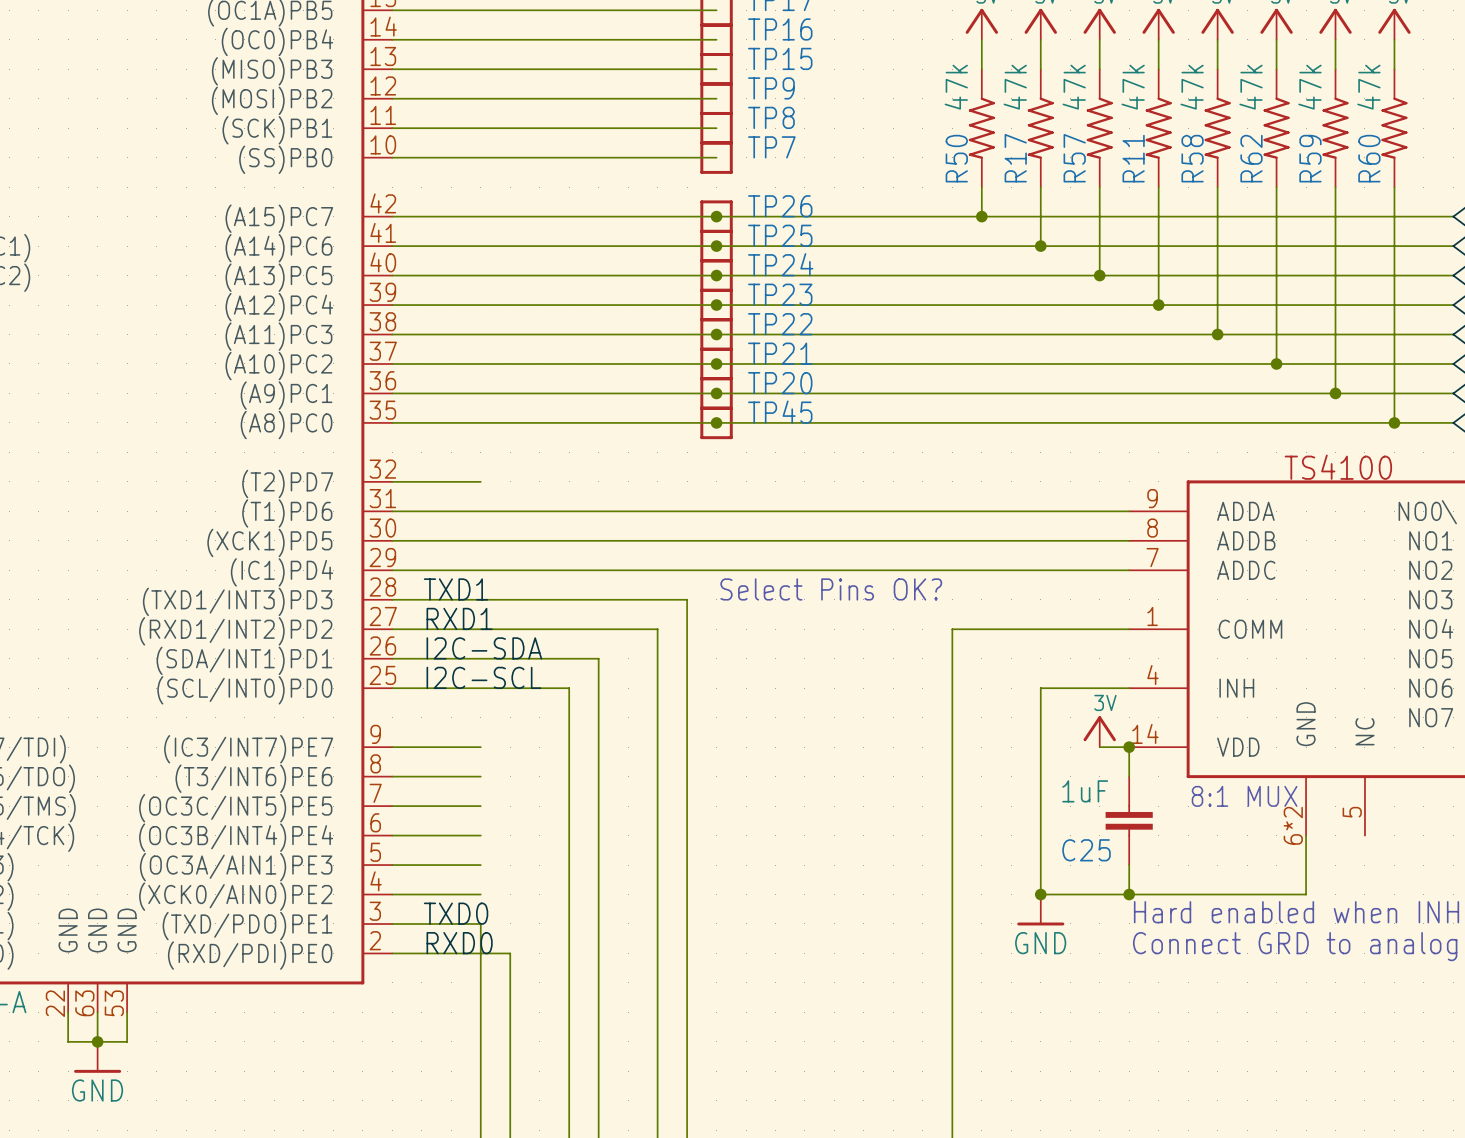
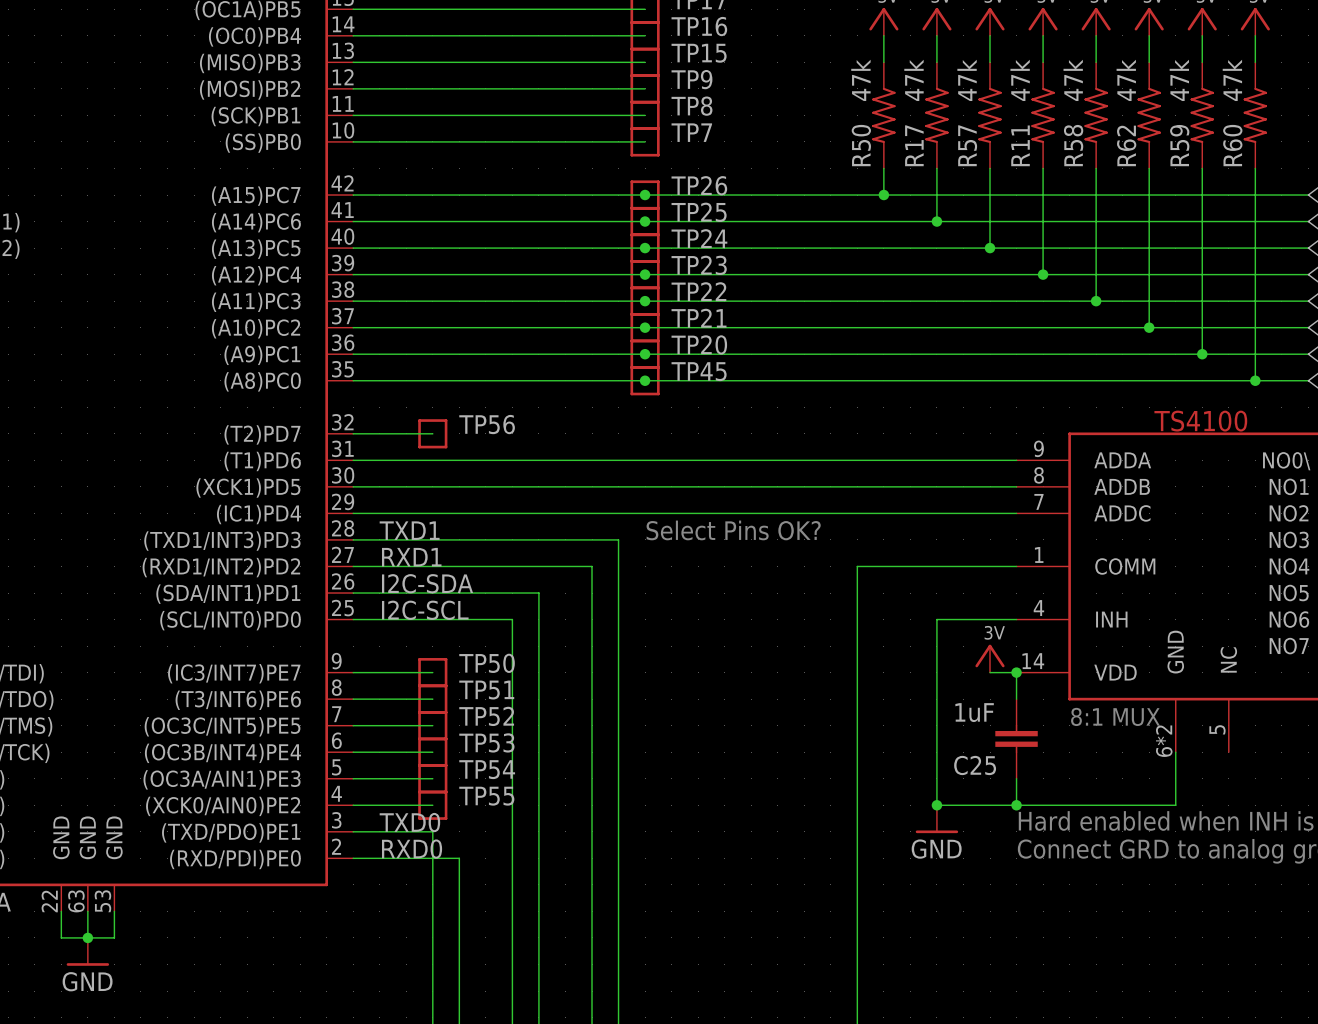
TP56: none -> (432, 433)
TP50: none -> (432, 672)
TP51: none -> (432, 699)
TP52: none -> (432, 725)
TP53: none -> (432, 752)
TP54: none -> (432, 778)
TP55: none -> (432, 805)

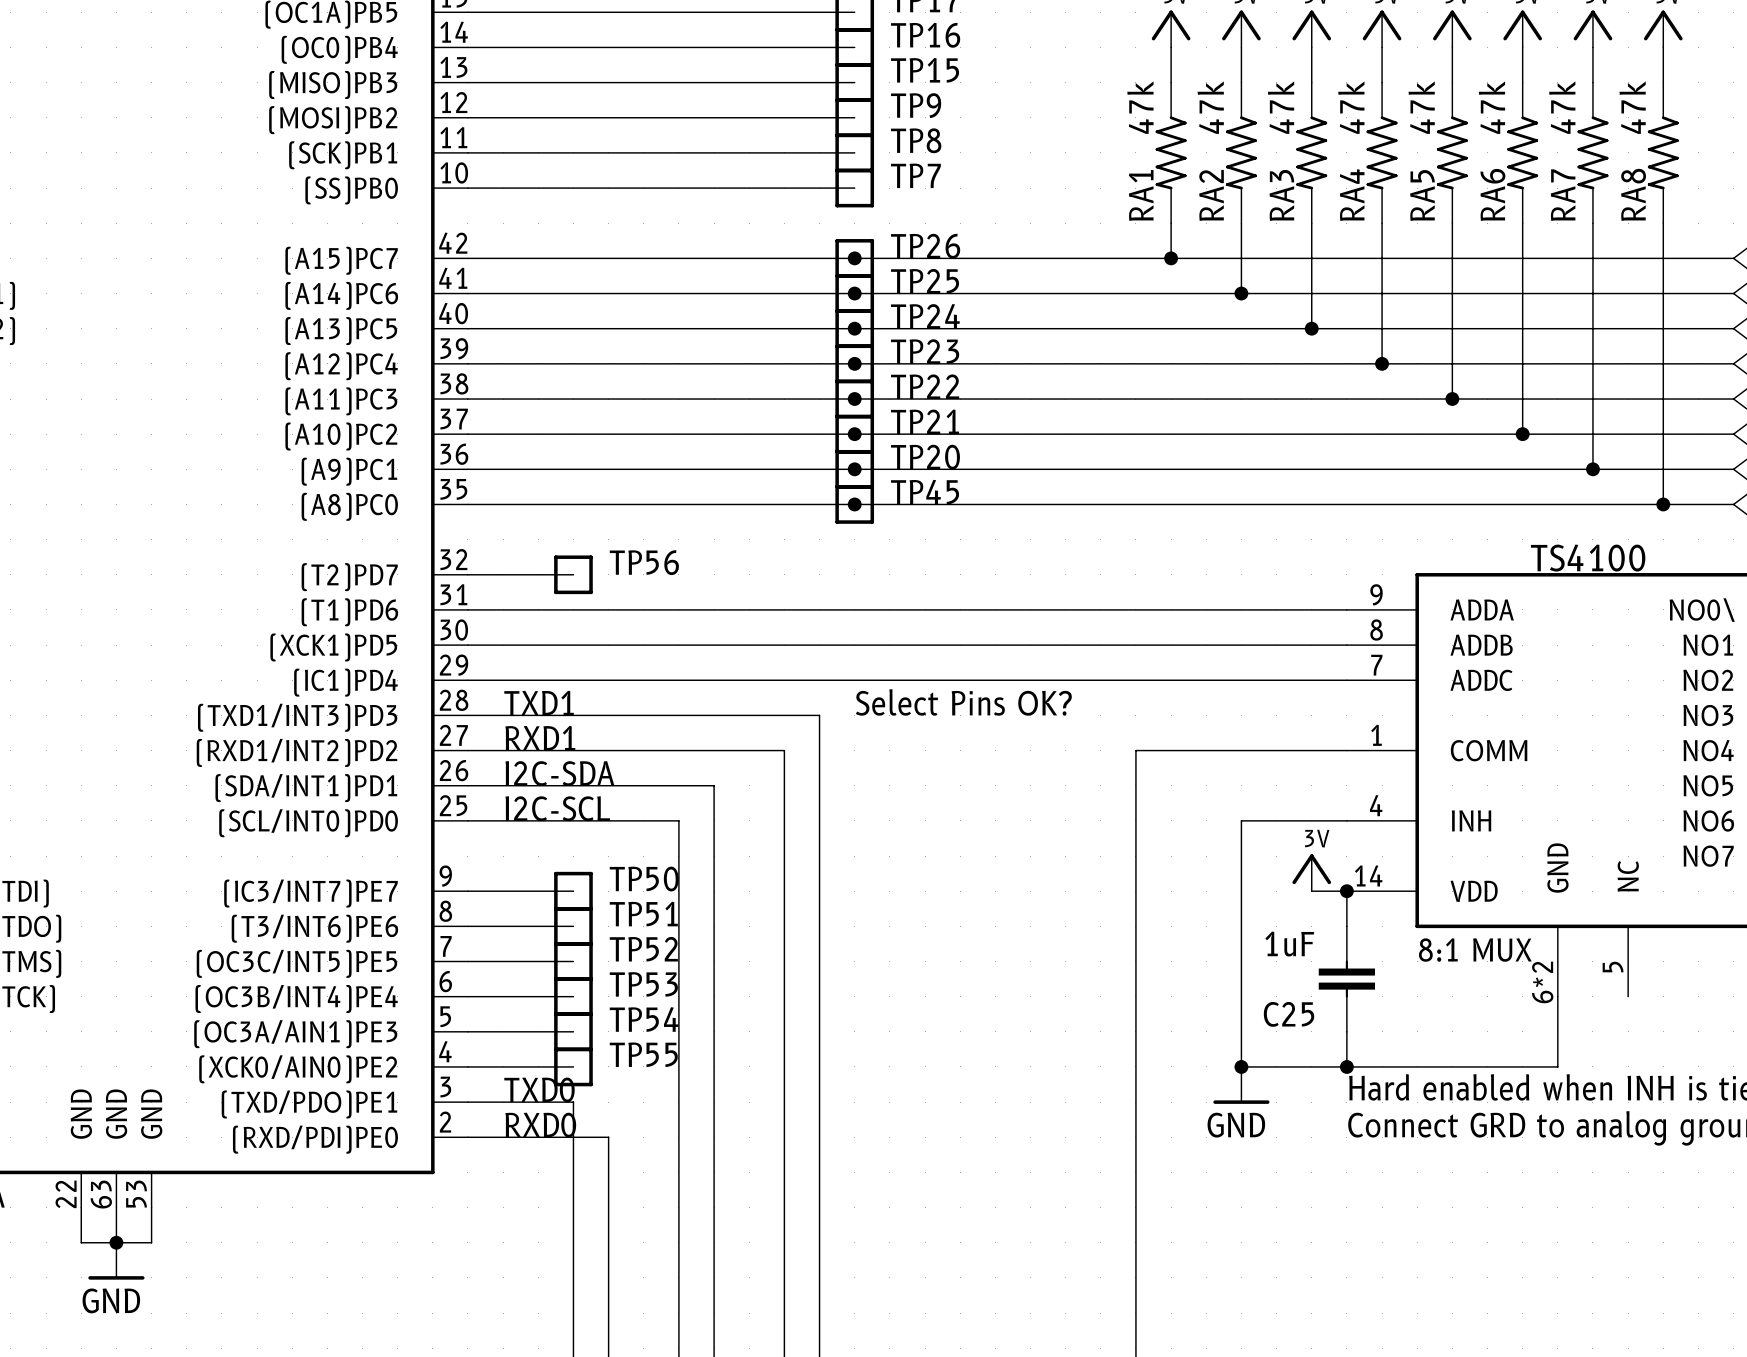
R50 name: R50 (861, 145) -> RA1 (1141, 195)
R17 name: R17 (914, 145) -> RA2 (1211, 195)
R57 name: R57 (967, 145) -> RA3 (1281, 195)
R11 name: R11 (1020, 145) -> RA4 (1352, 195)
R58 name: R58 (1073, 145) -> RA5 (1422, 195)
R62 name: R62 (1126, 145) -> RA6 (1492, 194)
R59 name: R59 (1179, 145) -> RA7 (1563, 195)
R60 name: R60 (1232, 145) -> RA8 (1633, 194)

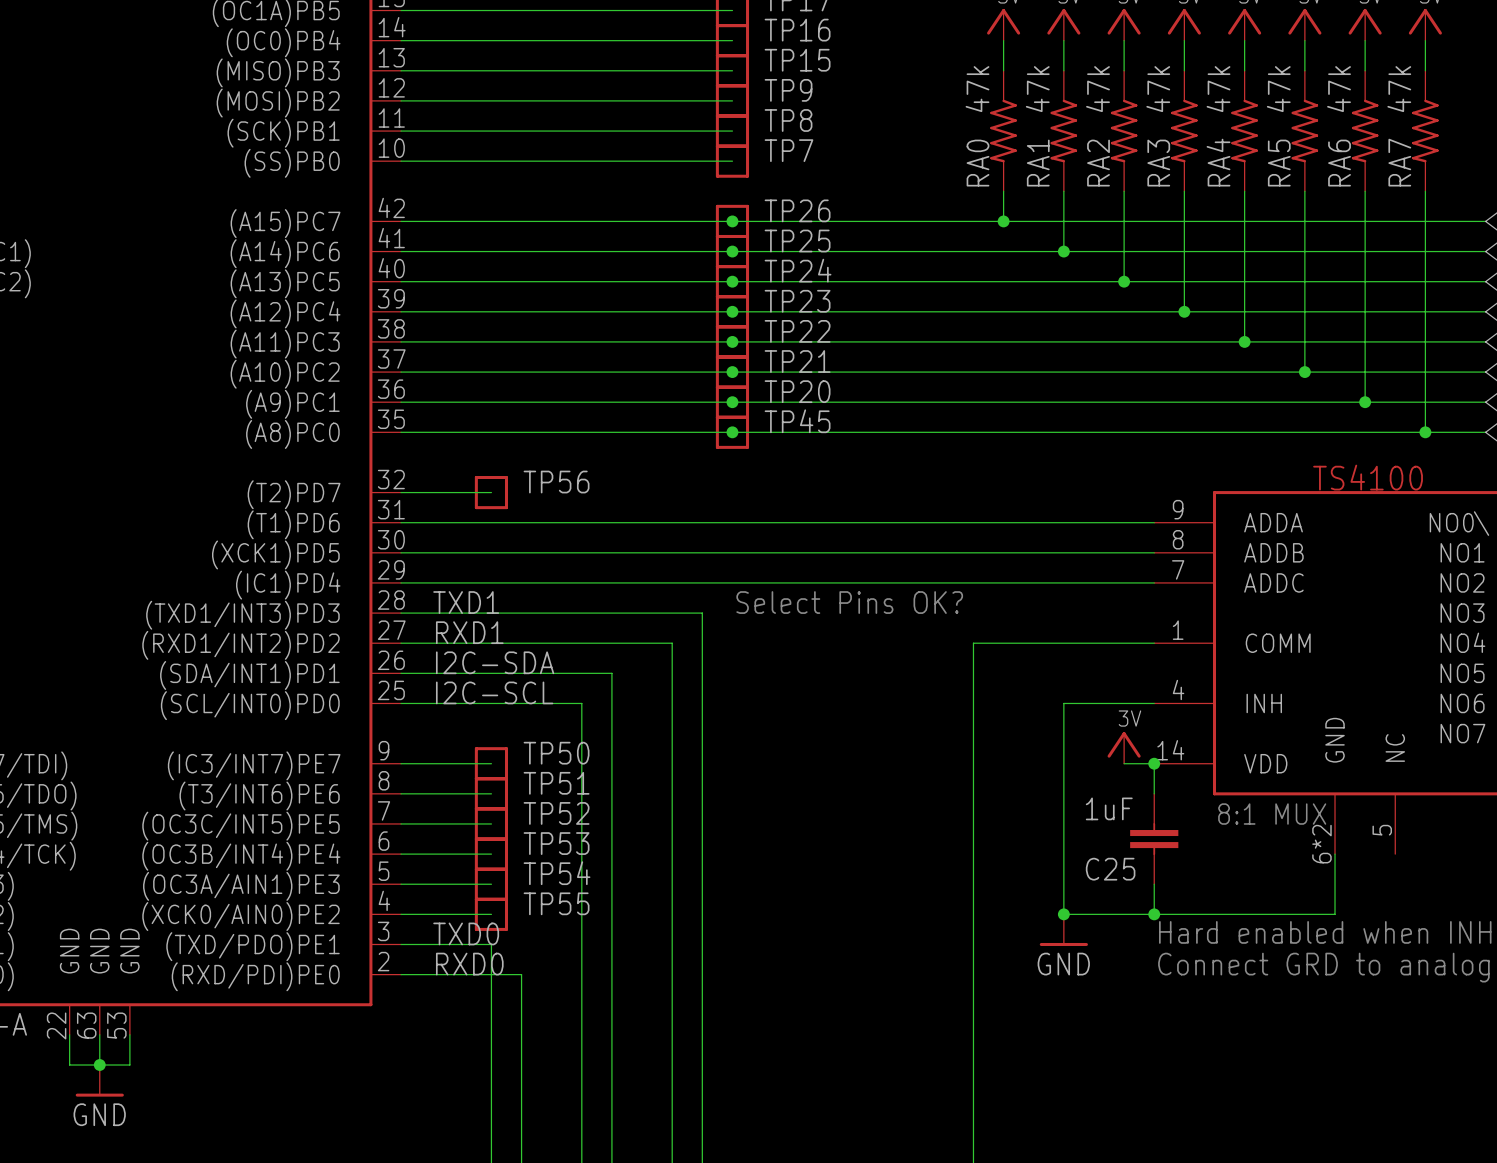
RA6 name: RA6 (1492, 194) -> RA5 (1279, 163)
RA8 name: RA8 (1633, 194) -> RA7 (1399, 162)
RA1 name: RA1 (1141, 195) -> RA0 (977, 163)
RA2 name: RA2 (1211, 195) -> RA1 (1038, 163)
RA3 name: RA3 (1281, 195) -> RA2 (1098, 163)
RA4 name: RA4 (1352, 195) -> RA3 (1158, 163)
RA5 name: RA5 (1422, 195) -> RA4 (1218, 162)
RA7 name: RA7 (1563, 195) -> RA6 (1339, 163)

